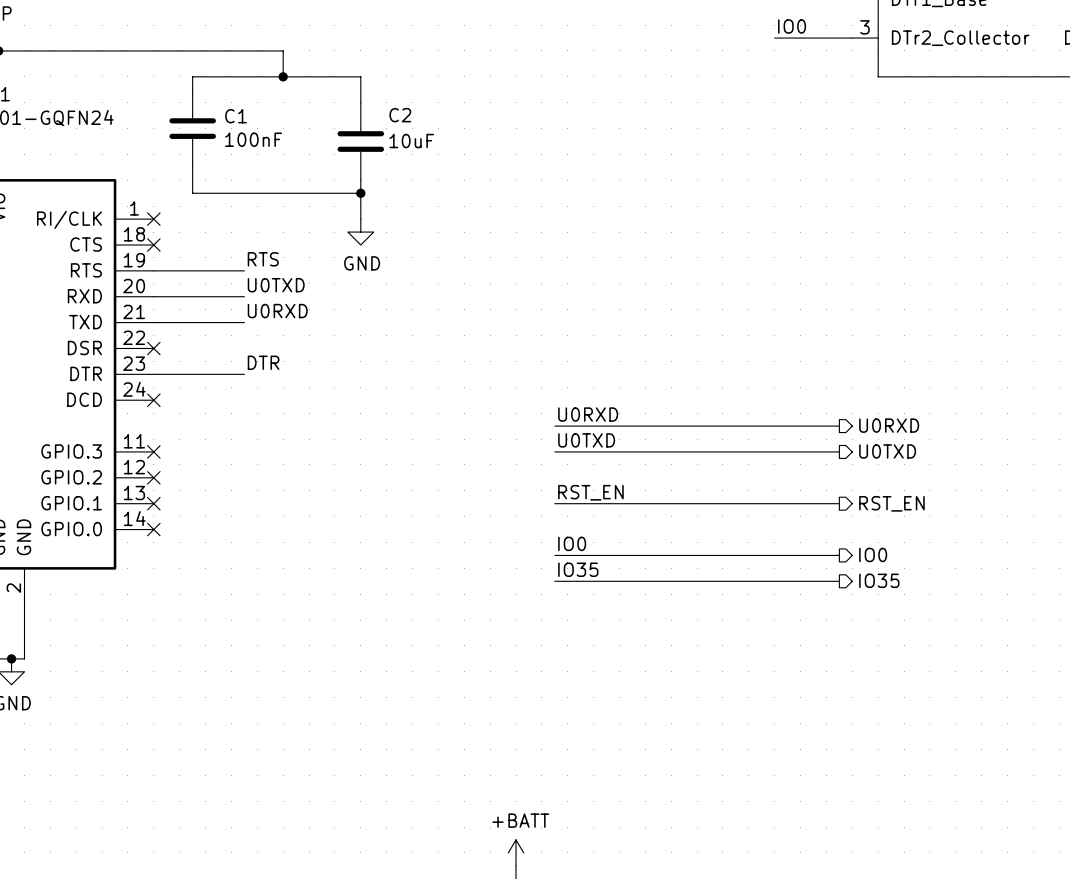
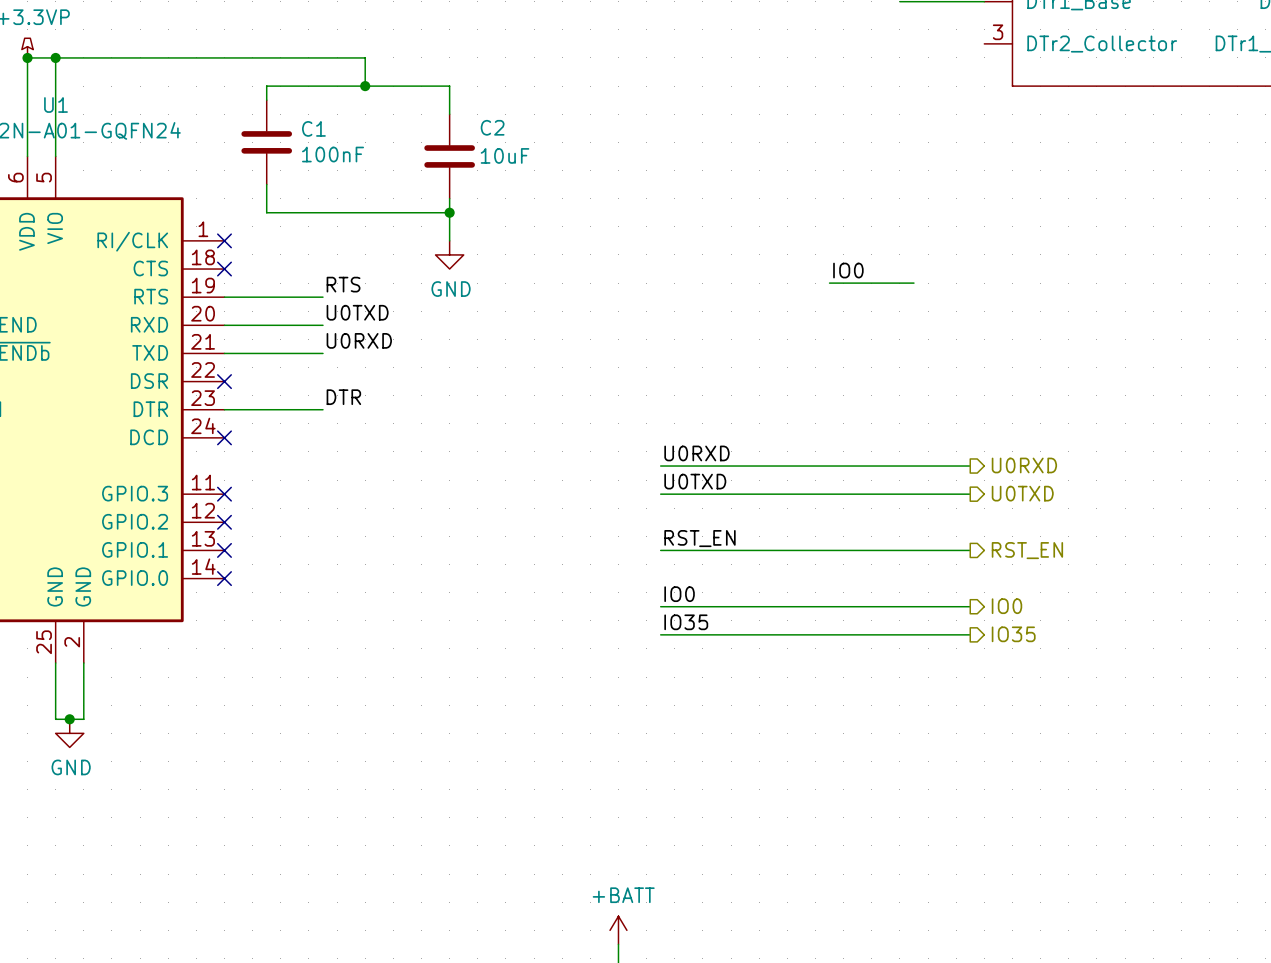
label position: IO0 (792, 26) -> IO0 (848, 270)
wire: (774, 38) (852, 38) -> (829, 283) (913, 283)

